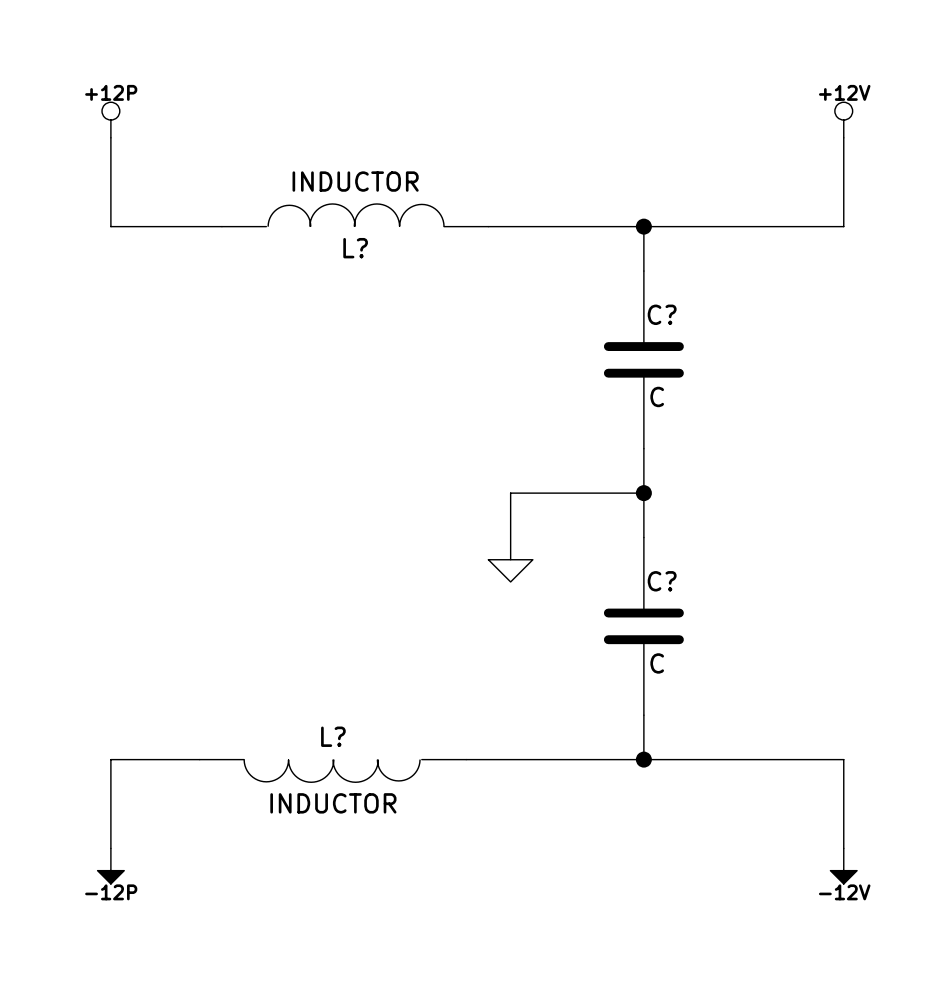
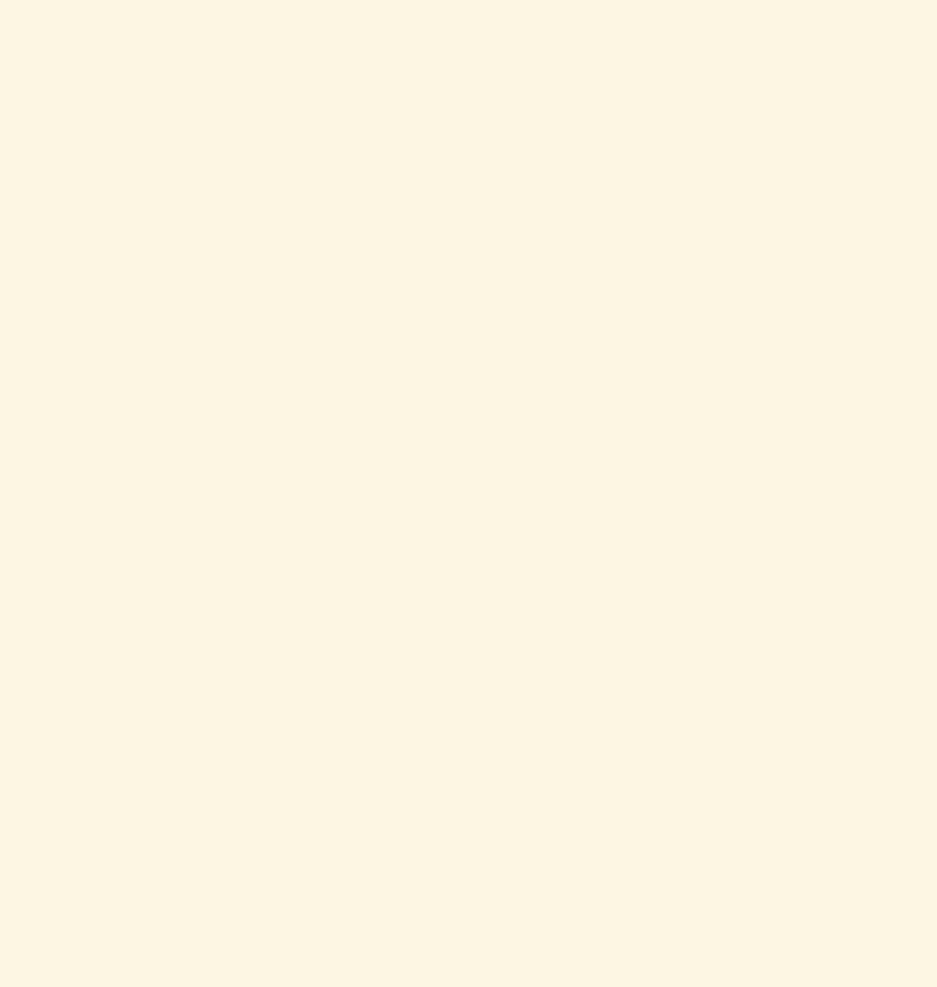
power symbol: +12P (110, 120) -> none
power symbol: +12V (843, 120) -> none
wire: (110, 137) (110, 226) (221, 226) -> none
wire: (843, 137) (843, 226) (488, 226) -> none
L?: INDUCTOR (355, 215) -> none
wire: (643, 226) (643, 271) -> none
junction: (643, 226) -> none
C?: C (643, 359) -> none
wire: (643, 448) (643, 537) -> none
wire: (643, 493) (510, 493) (510, 559) -> none
junction: (643, 493) -> none
power symbol: (510, 570) -> none
C?: C (643, 626) -> none
wire: (643, 715) (643, 759) -> none
wire: (199, 759) (110, 759) (110, 848) -> none
wire: (466, 759) (843, 759) (843, 848) -> none
junction: (643, 759) -> none
L?: INDUCTOR (332, 770) -> none
power symbol: -12P (110, 866) -> none
power symbol: -12V (843, 866) -> none

